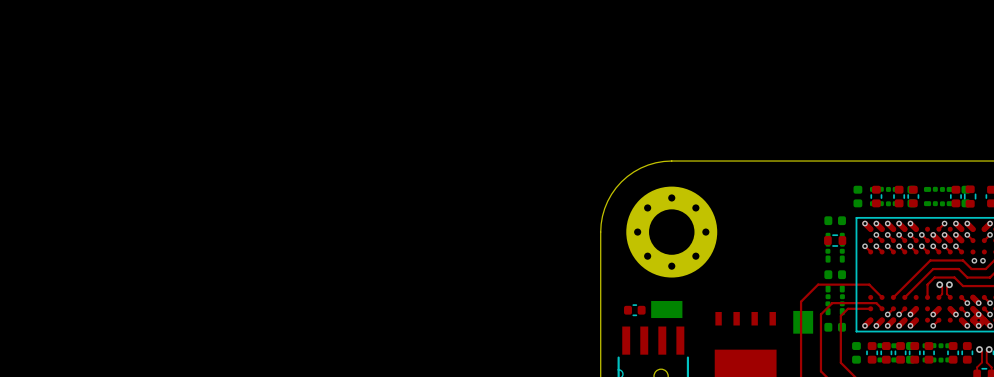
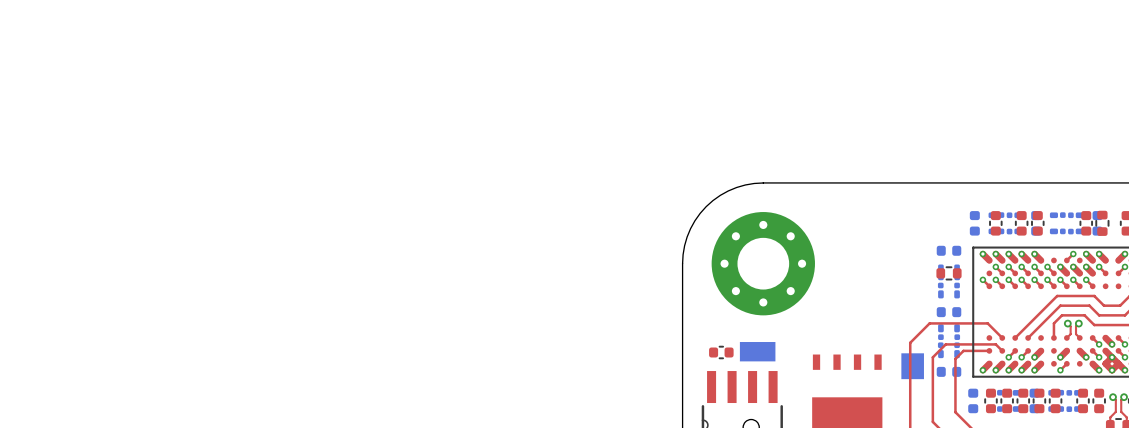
via: (974, 260) -> none
via: (982, 260) -> none

